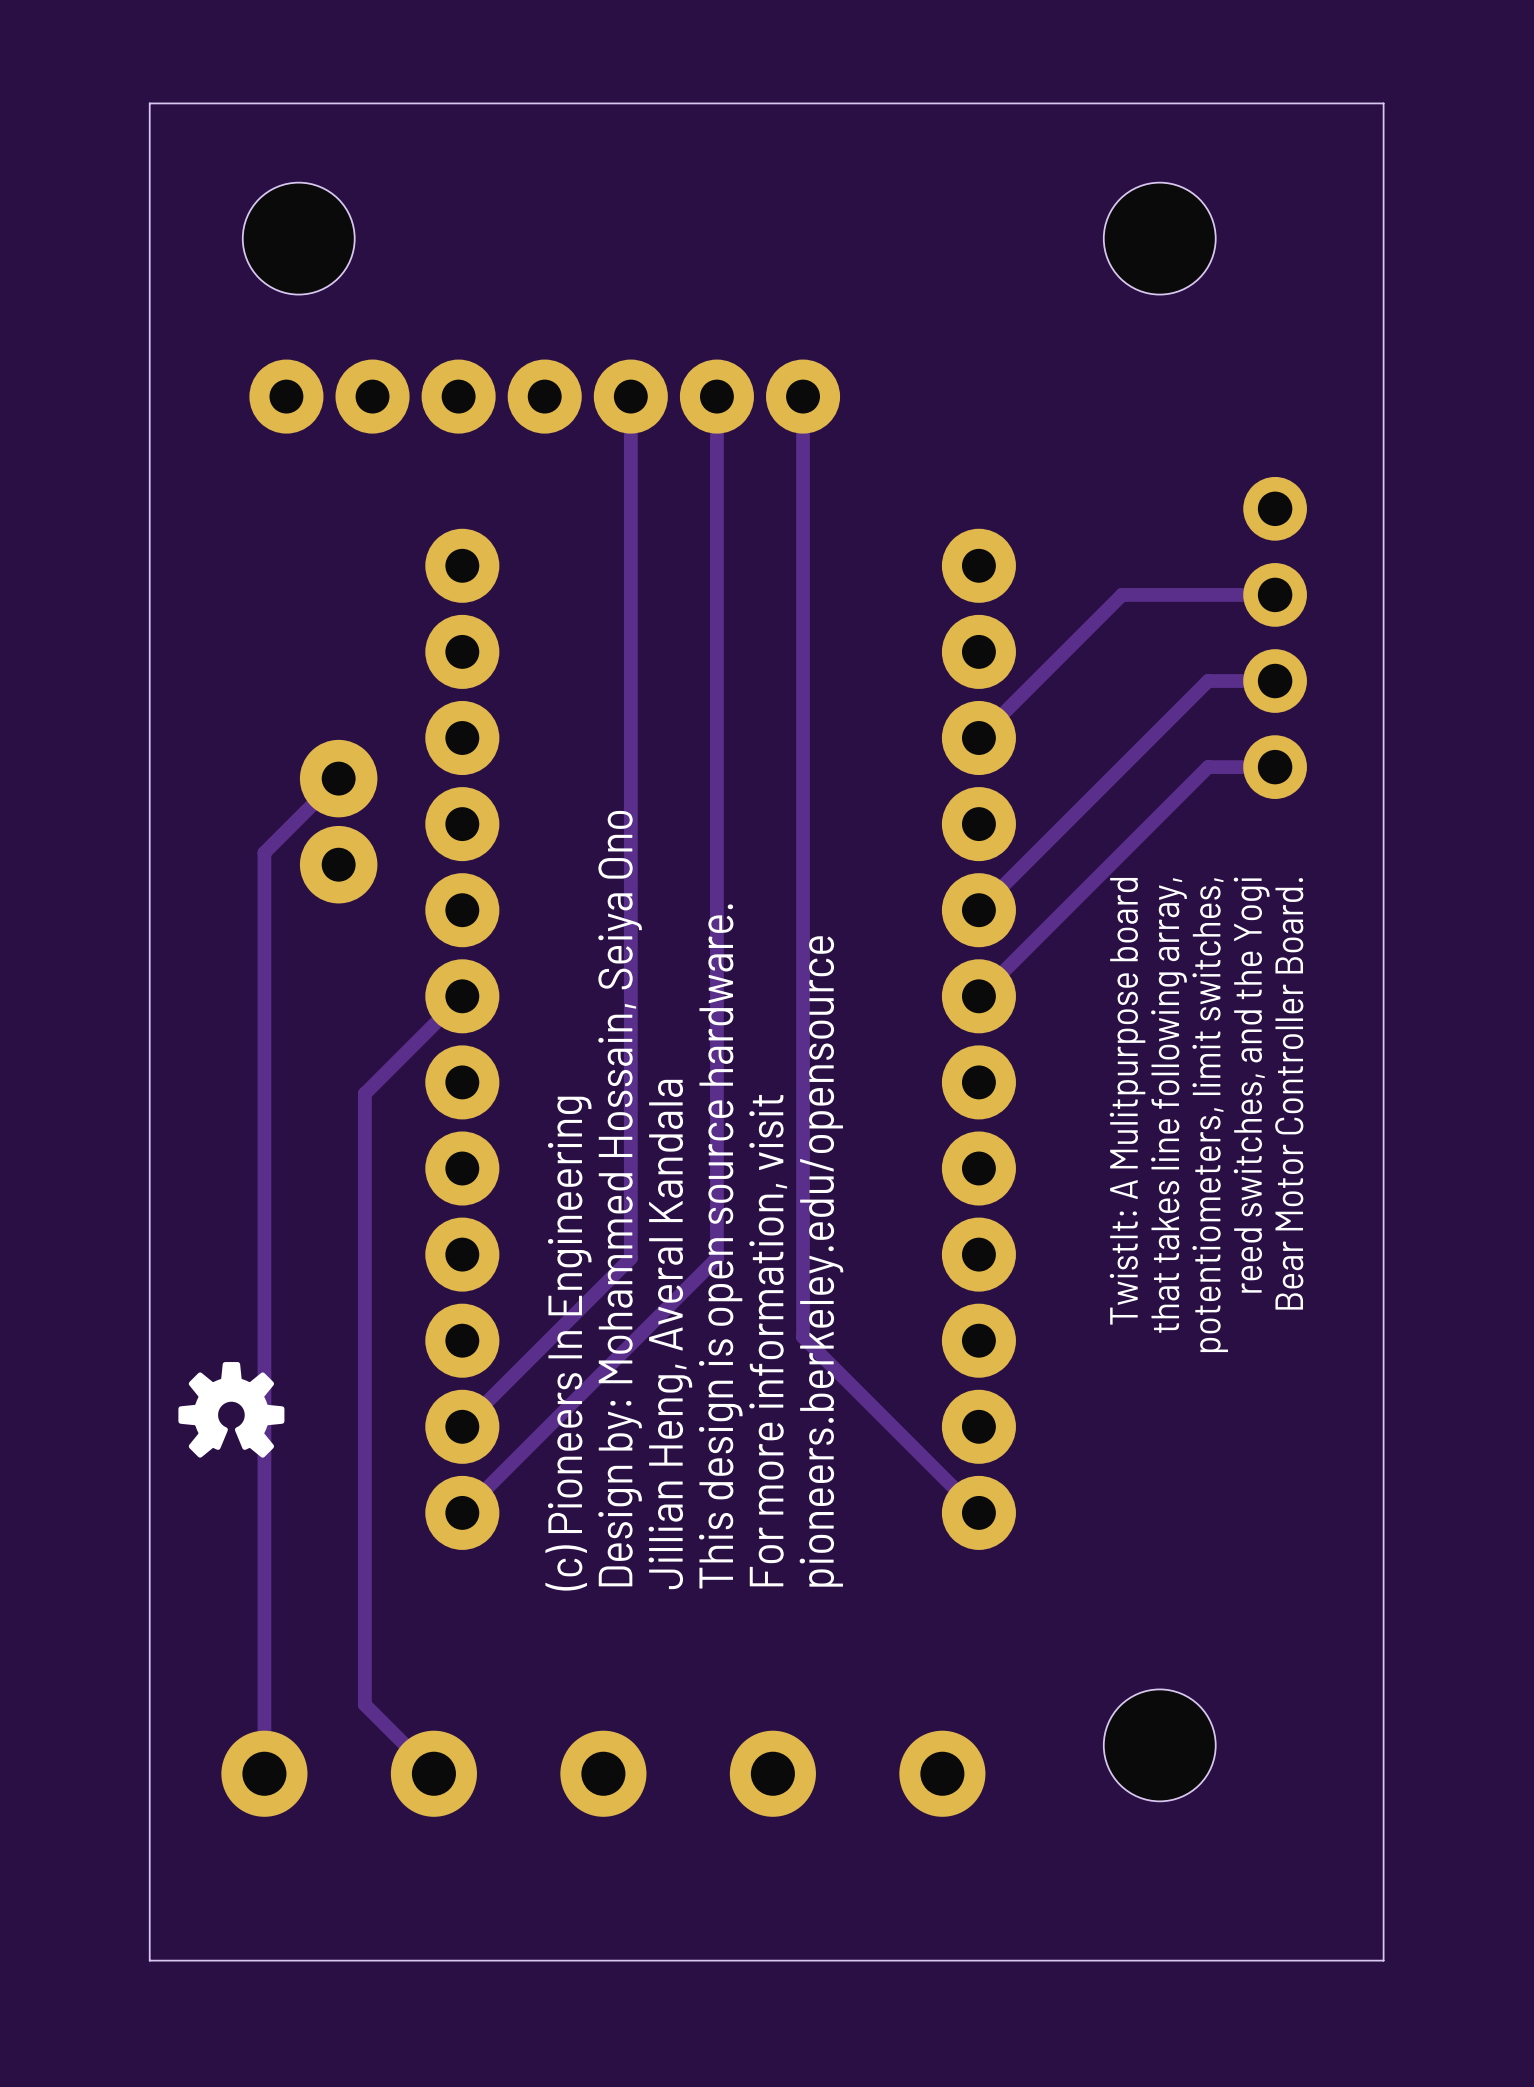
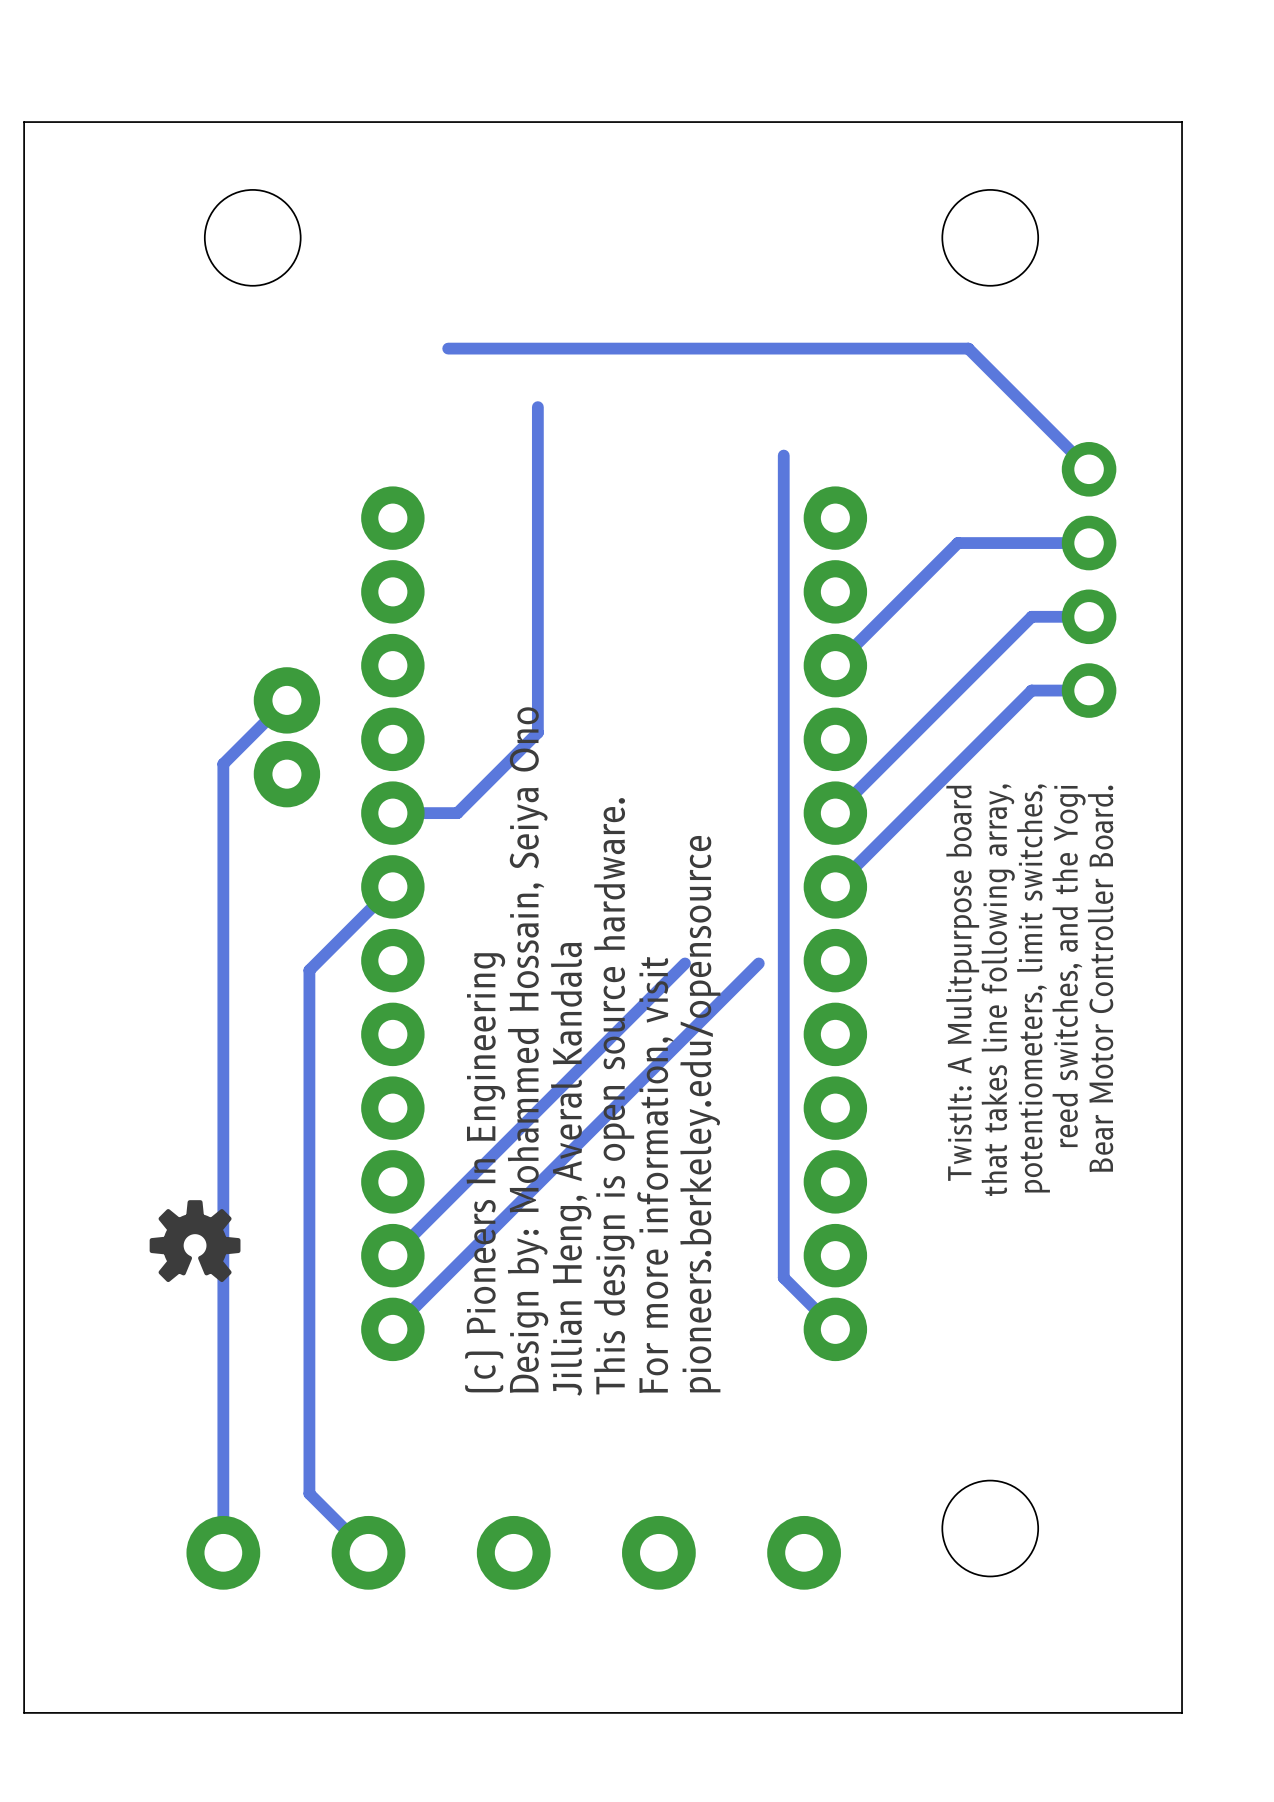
board edge: (149, 103) (149, 1960) -> (125, 122) (24, 122) (24, 1712) (125, 1712)
track: none -> (448, 348) (968, 348) (1089, 469)
part: (544, 396) -> none
track: (630, 396) (630, 1258) -> (685, 963) (537, 1111)
track: (716, 396) (716, 1258) -> (758, 963) (610, 1111)
track: (803, 396) (803, 1337) (918, 1452) -> (783, 455) (783, 1277)
track: none -> (537, 407) (537, 732) (457, 813) (392, 813)

